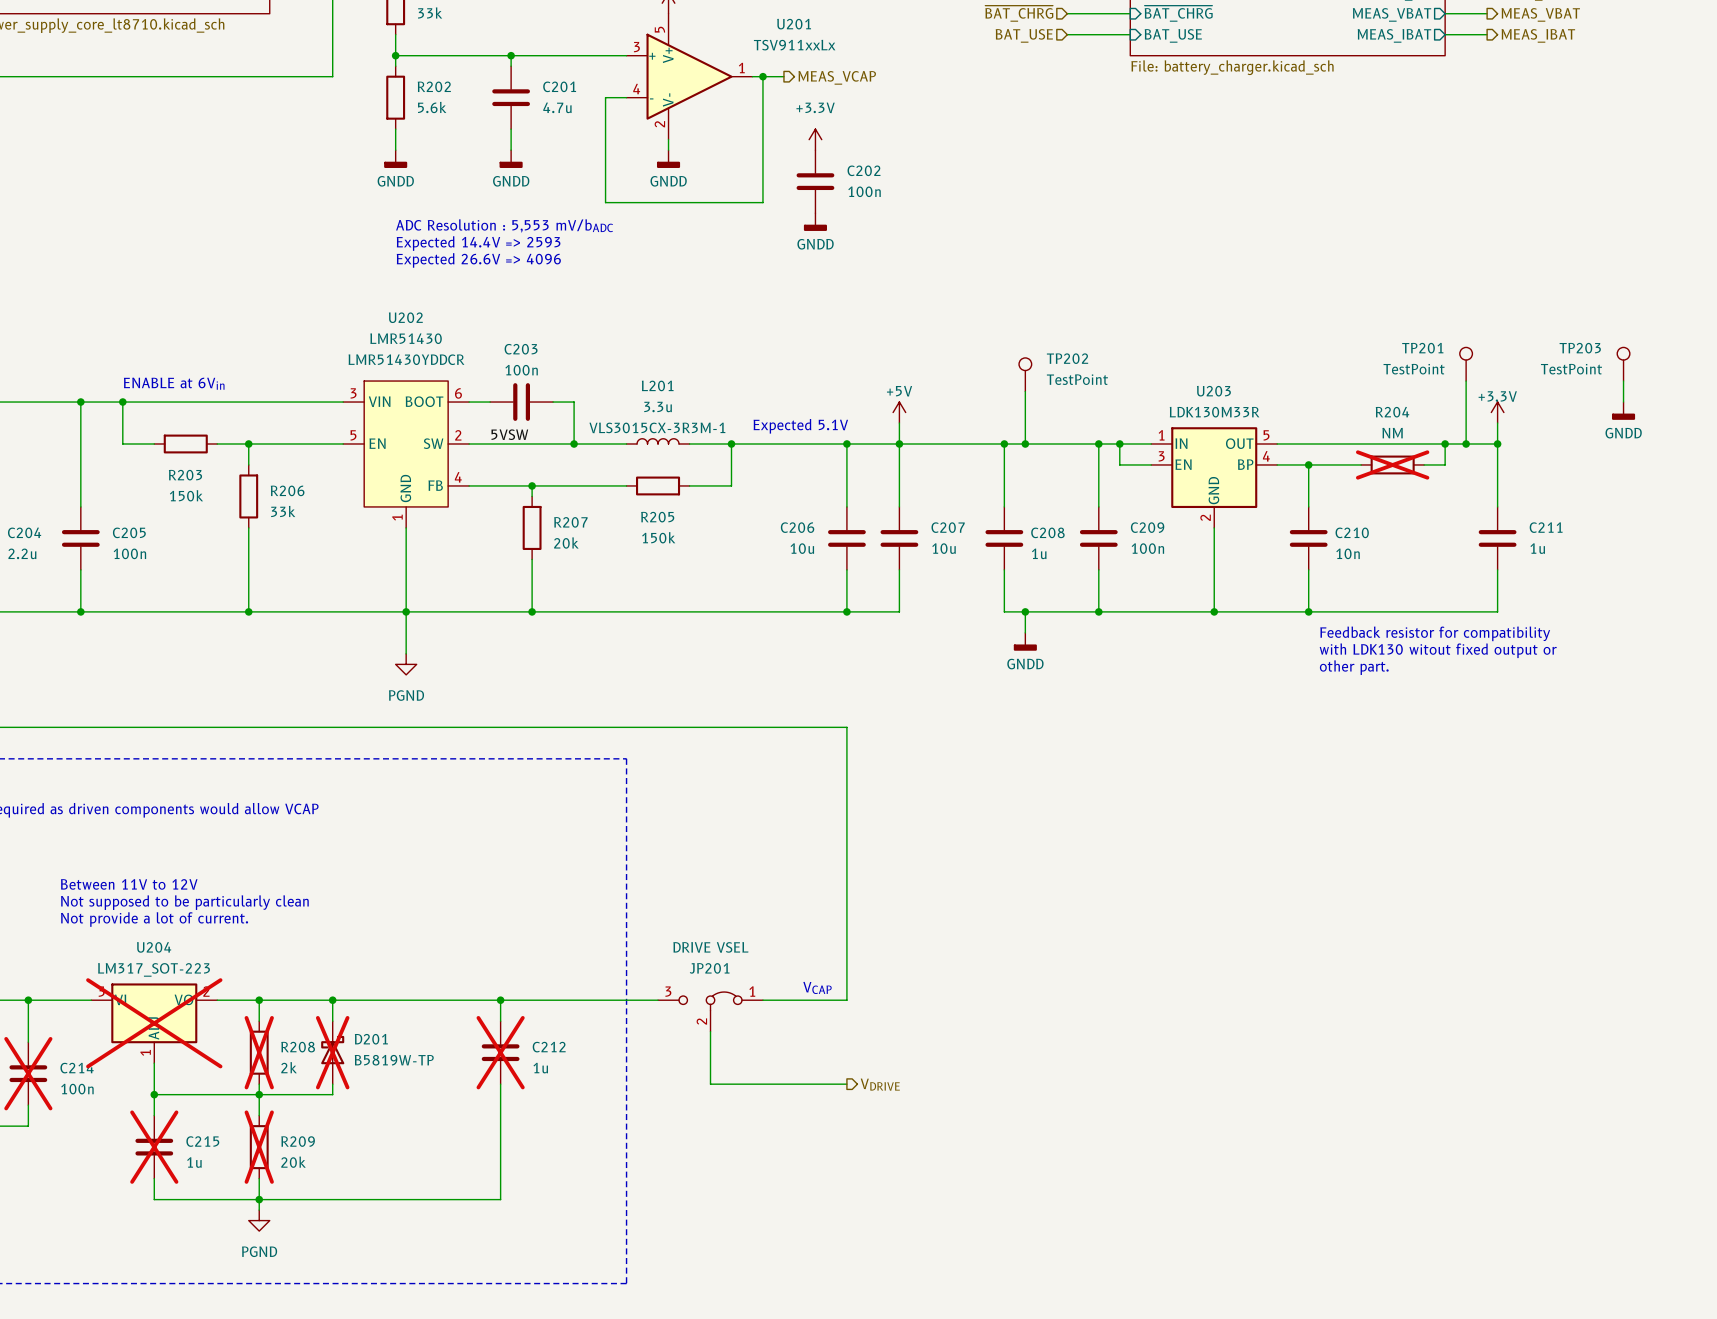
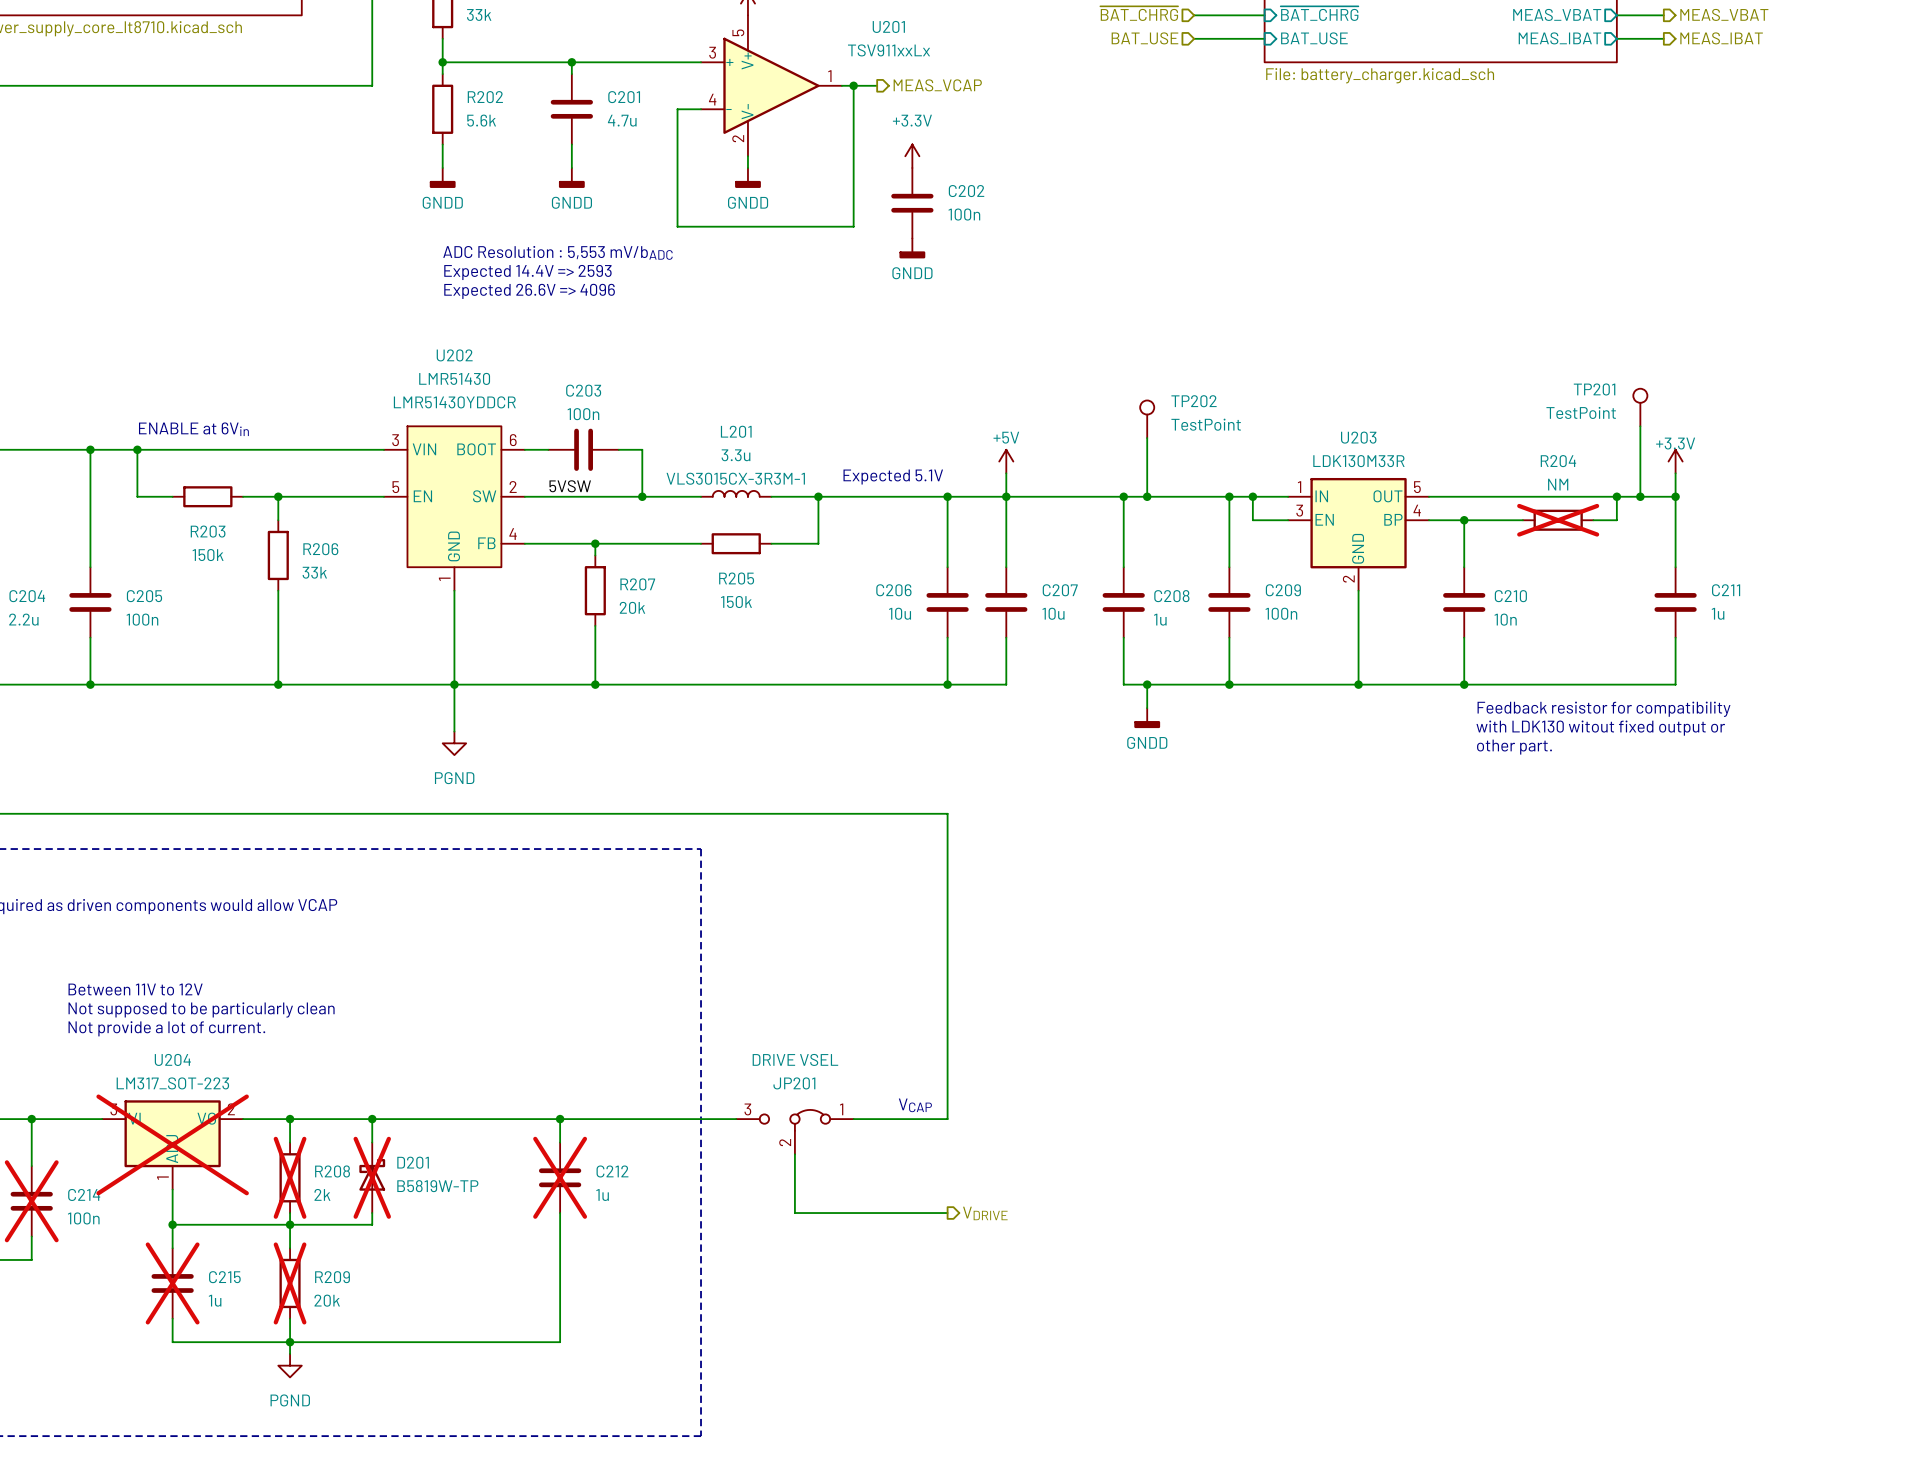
TP203: TestPoint (1623, 364) -> none
wire: (1623, 381) (1623, 402) -> none
power symbol: GNDD (1623, 410) -> none

